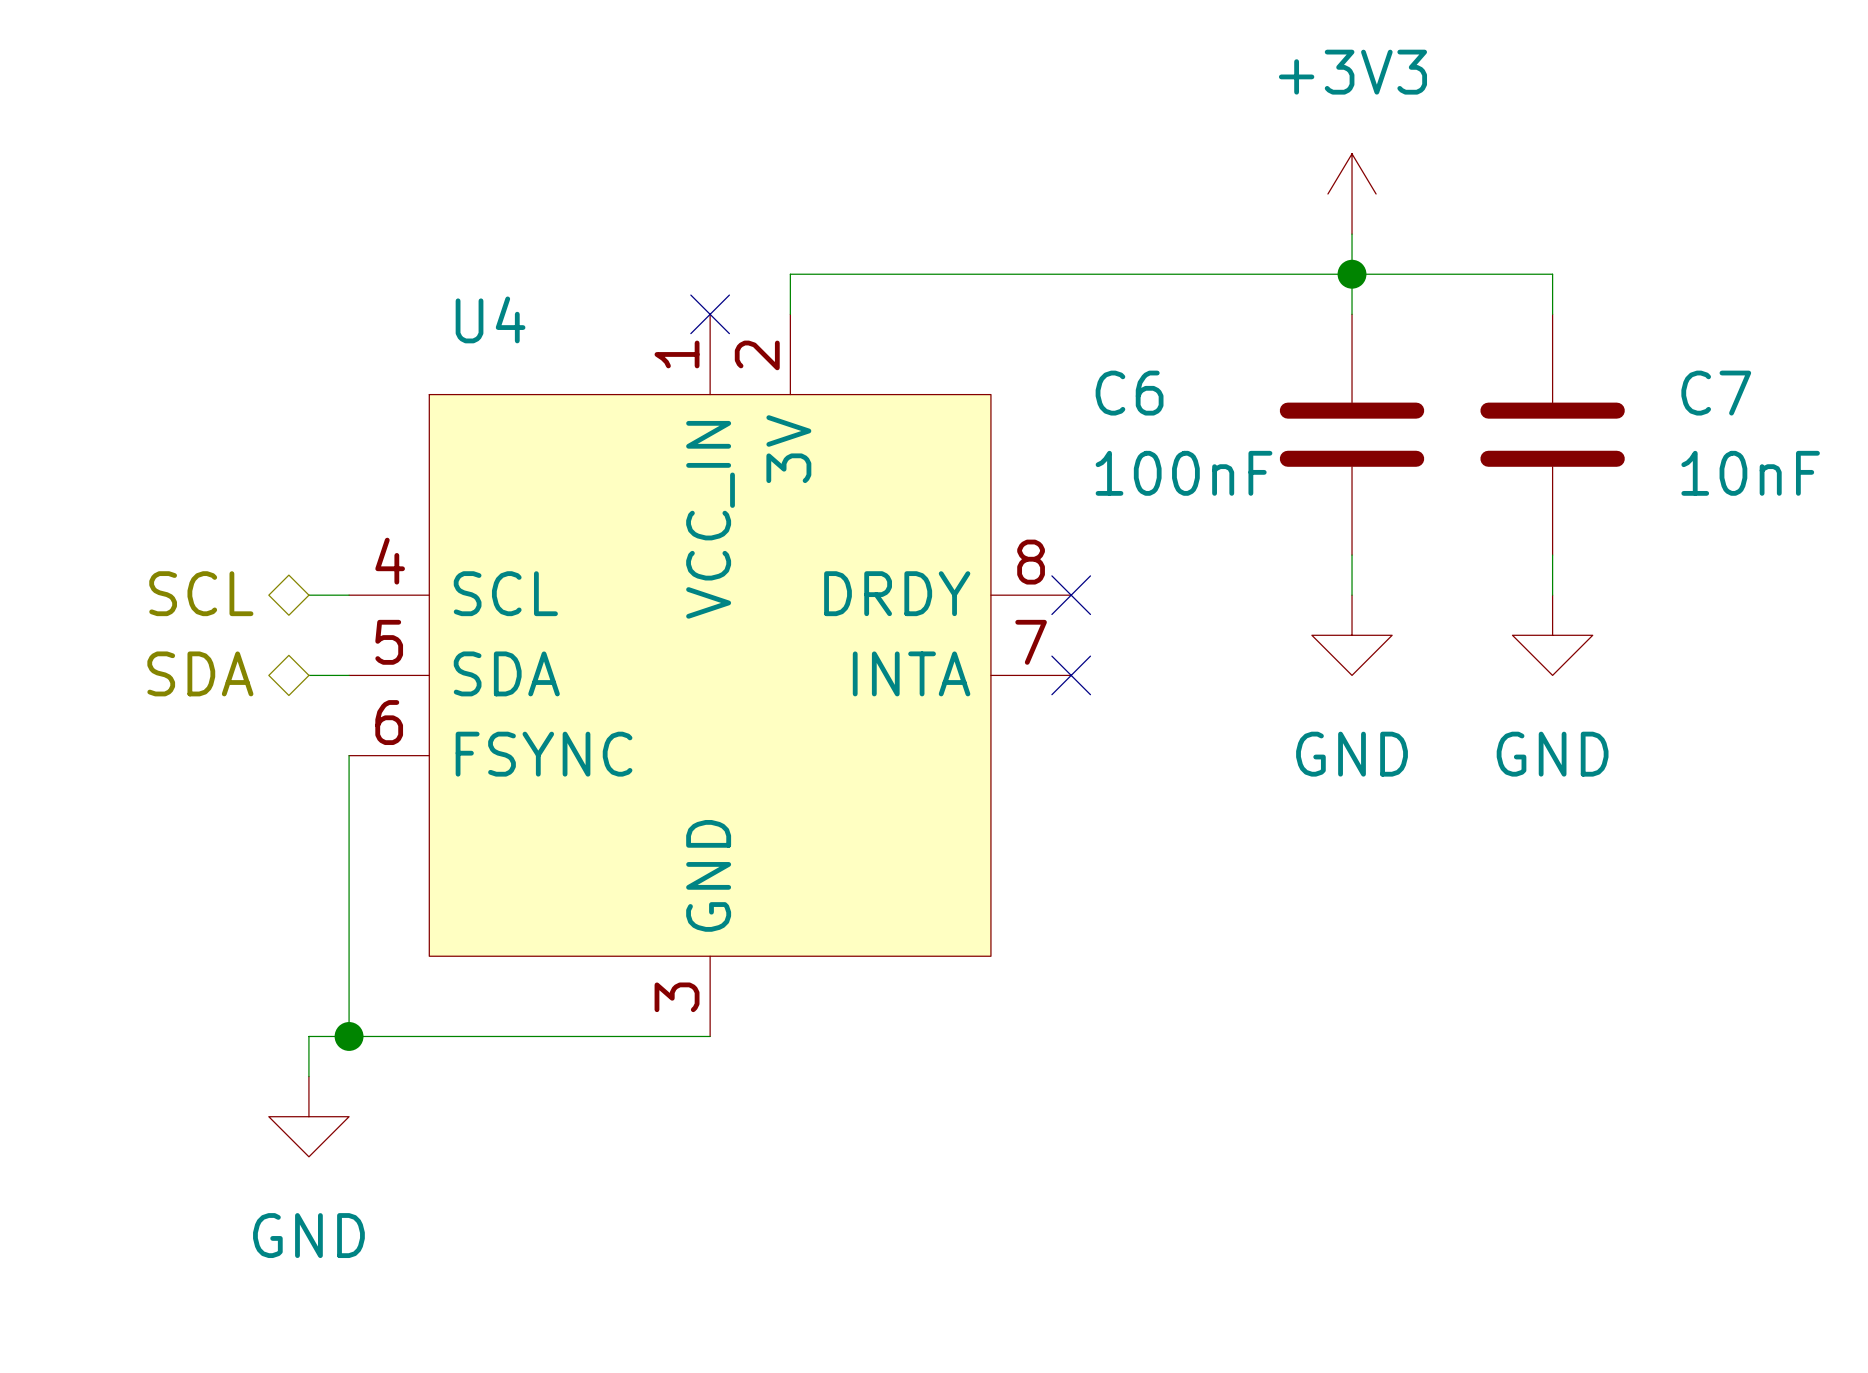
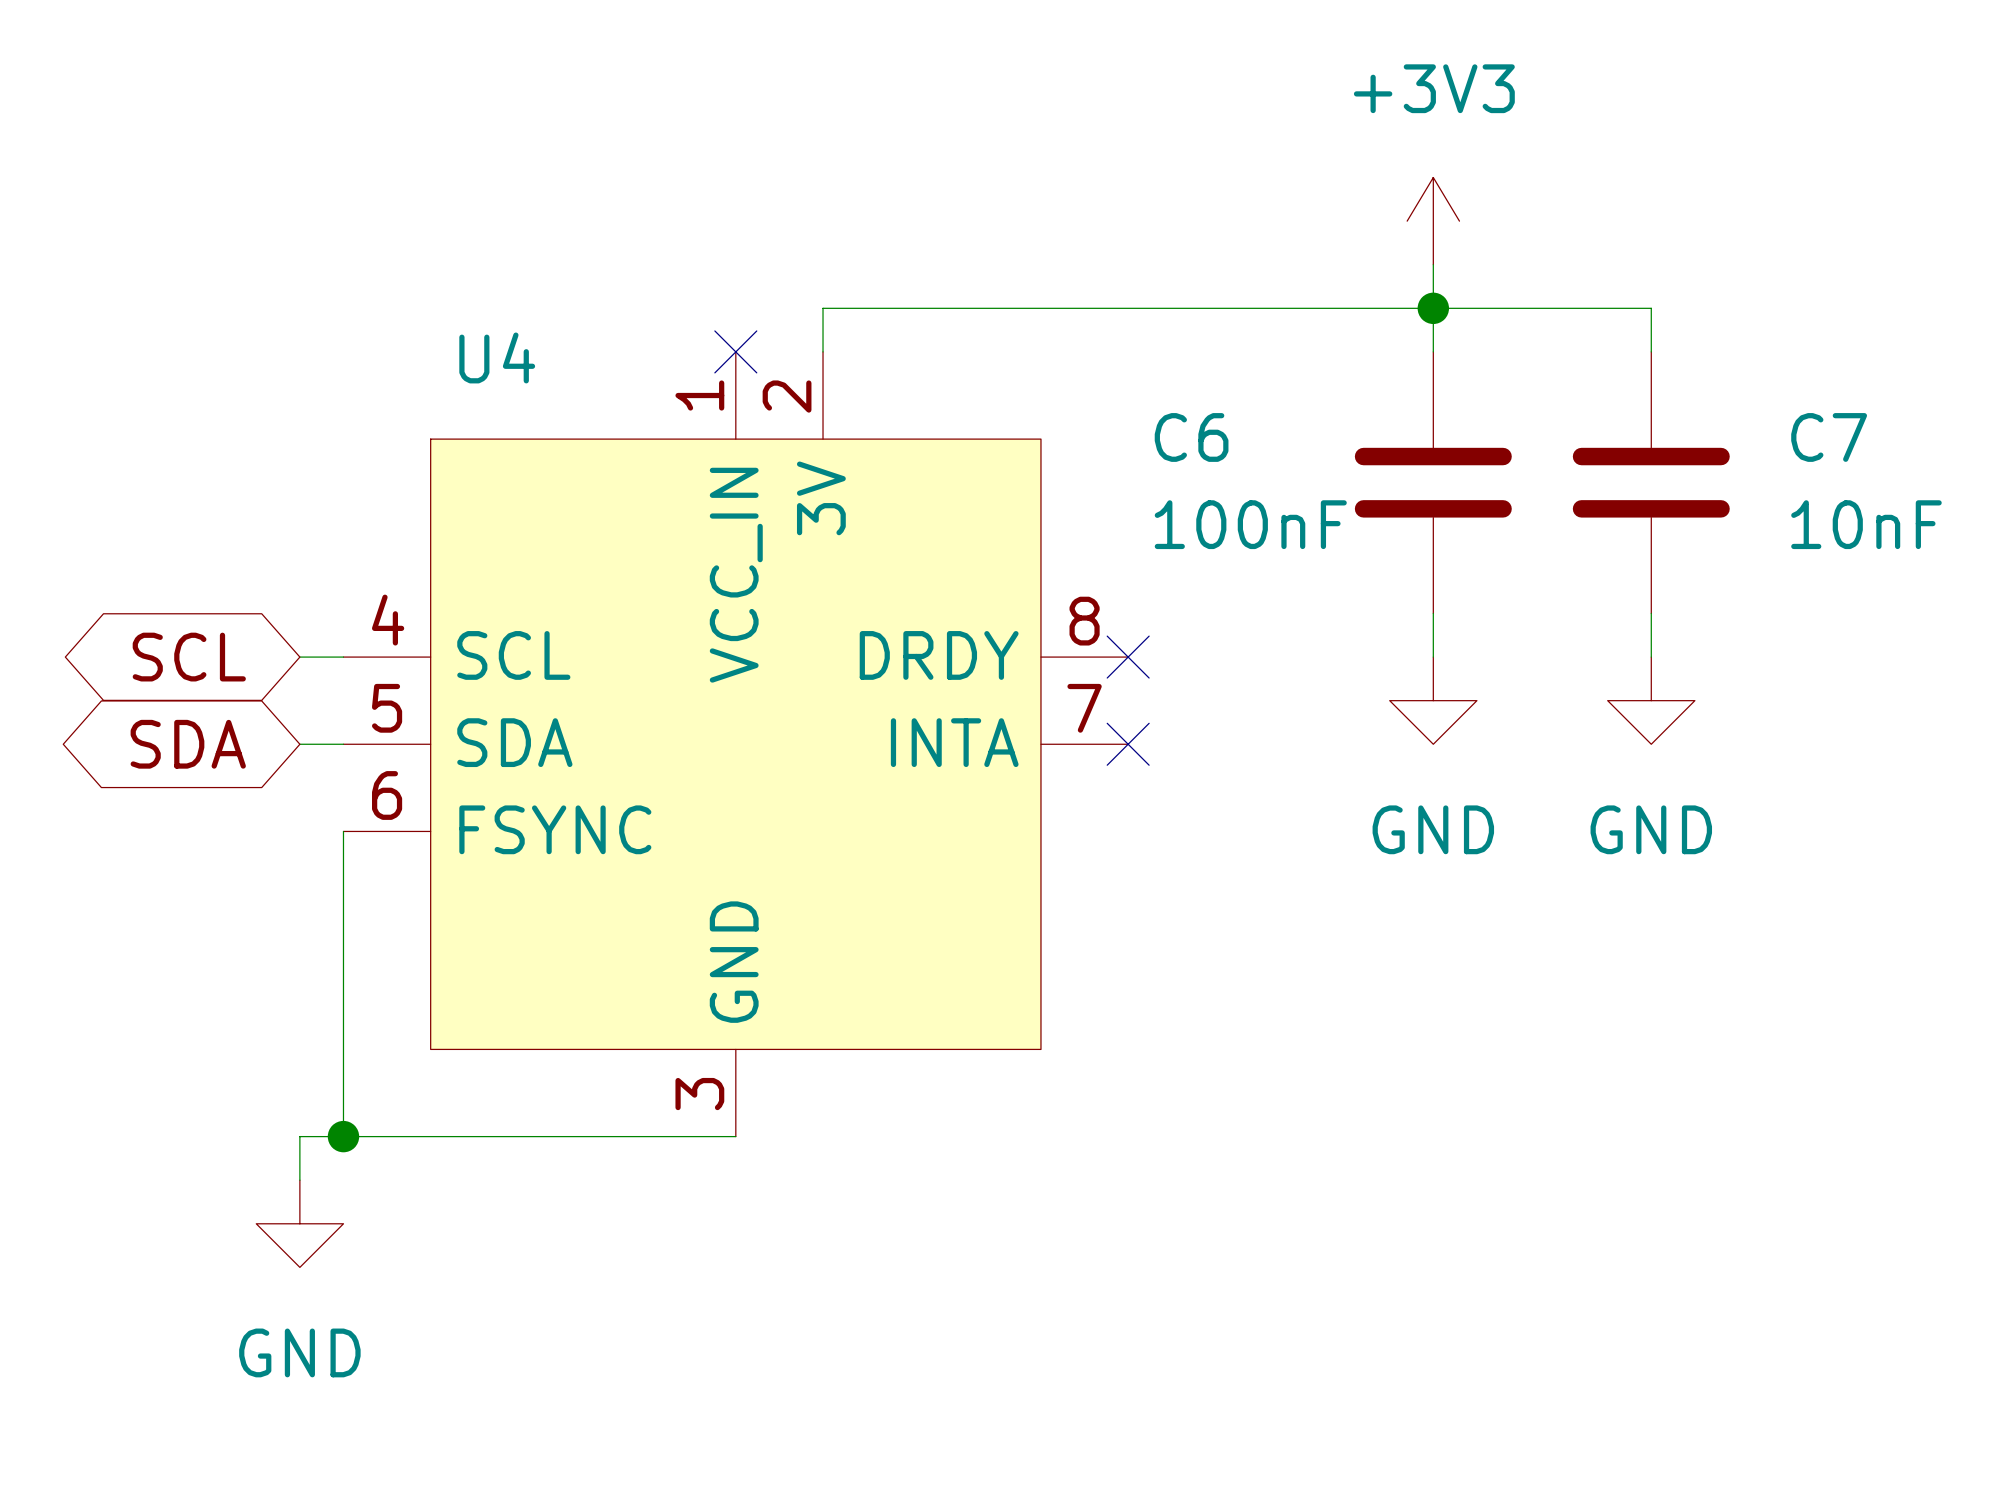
hierarchical label: SCL (201, 593) -> none
global label: none -> SCL (189, 657)
hierarchical label: SDA (200, 673) -> none
global label: none -> SDA (188, 744)

